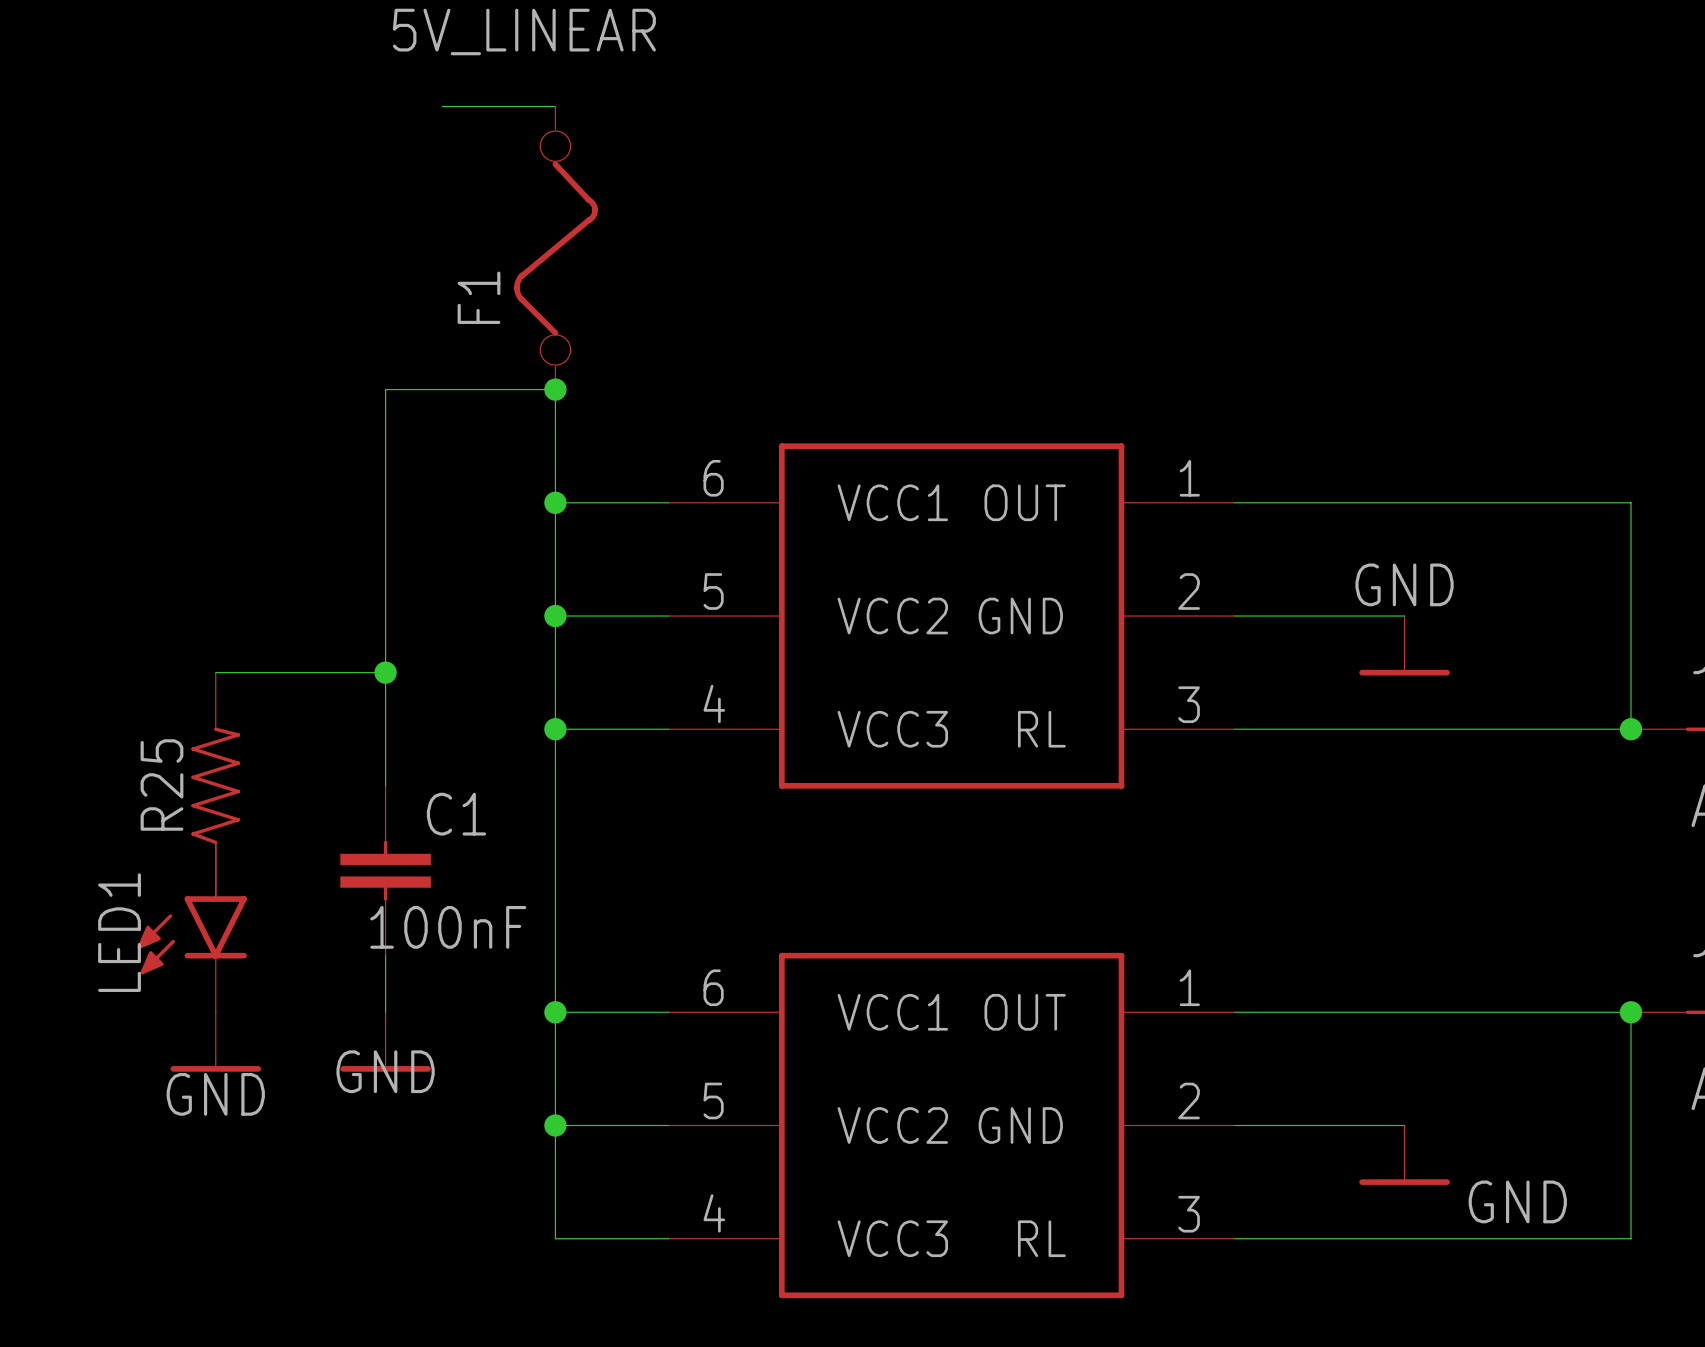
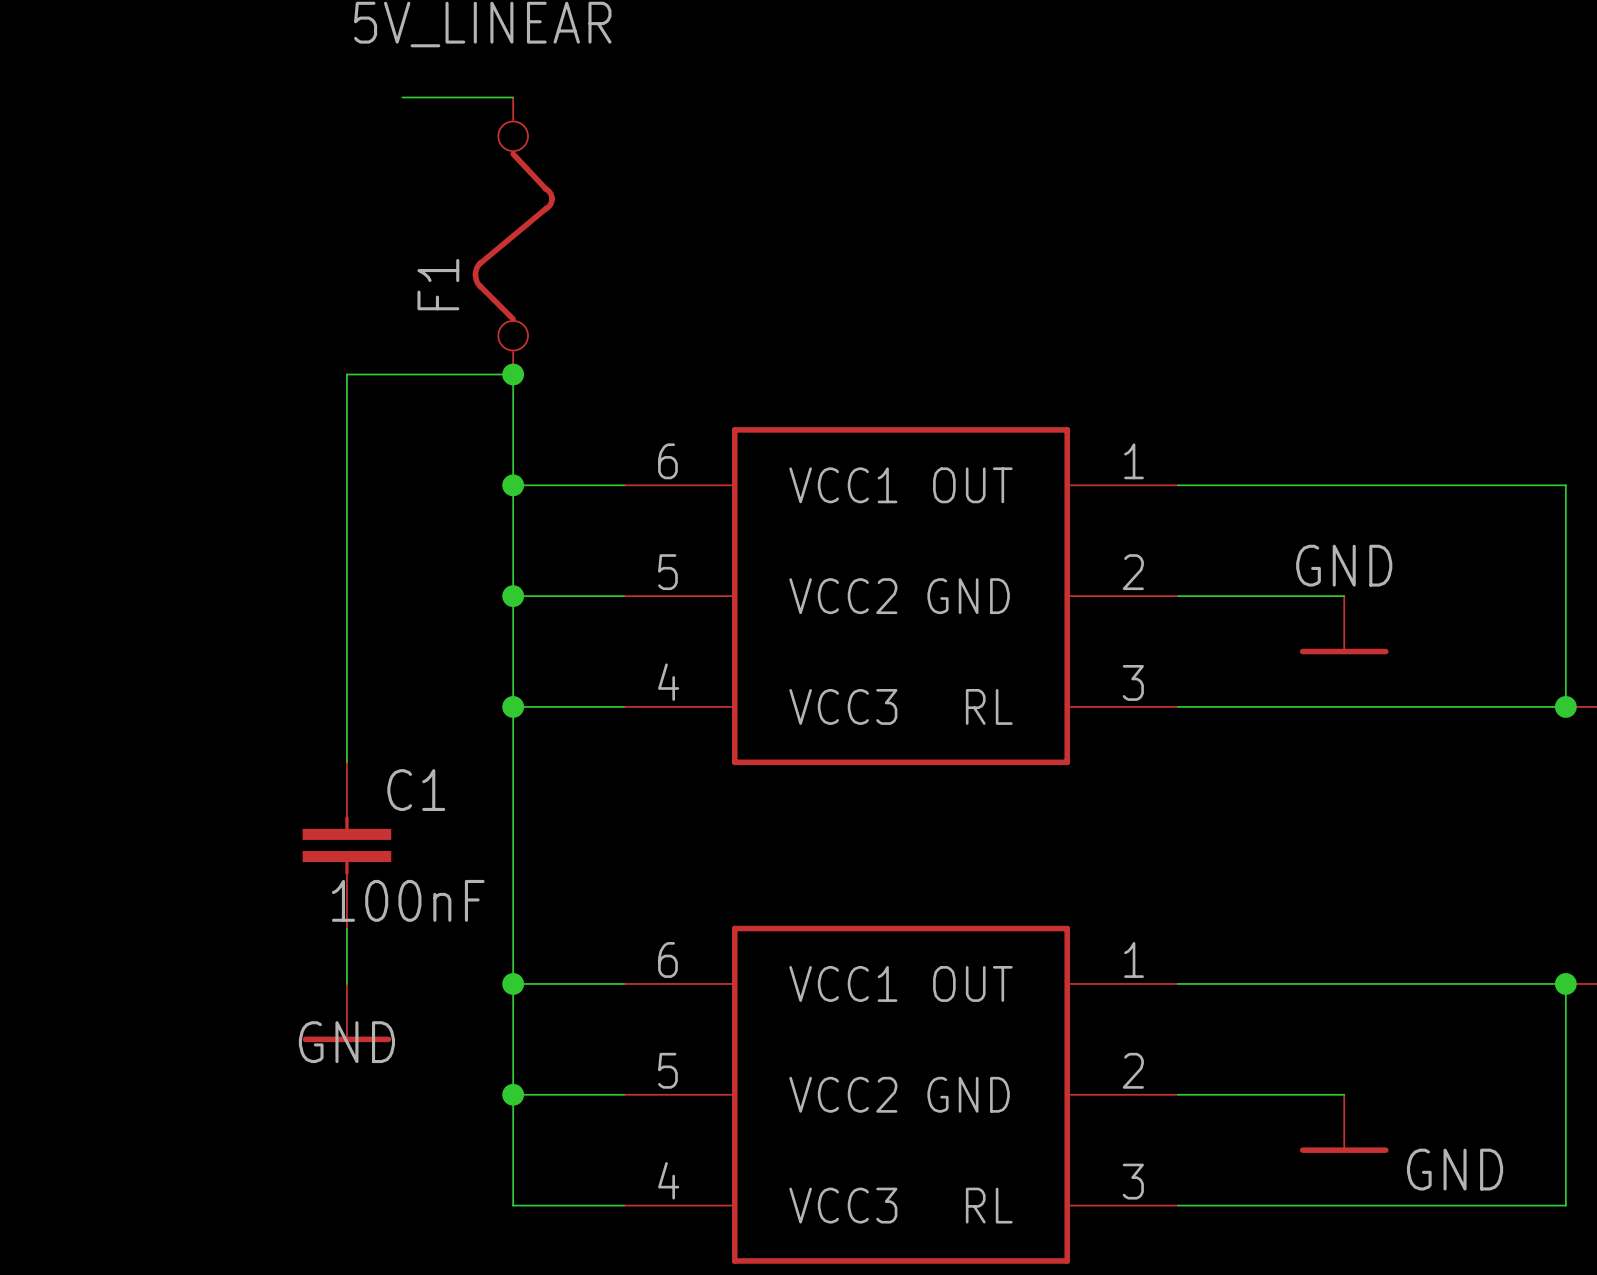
wire: (215, 672) (385, 672) -> none
junction: (385, 672) -> none
R25: (215, 785) -> none
LED1: (192, 927) -> none
power symbol: GND (215, 1042) -> none

